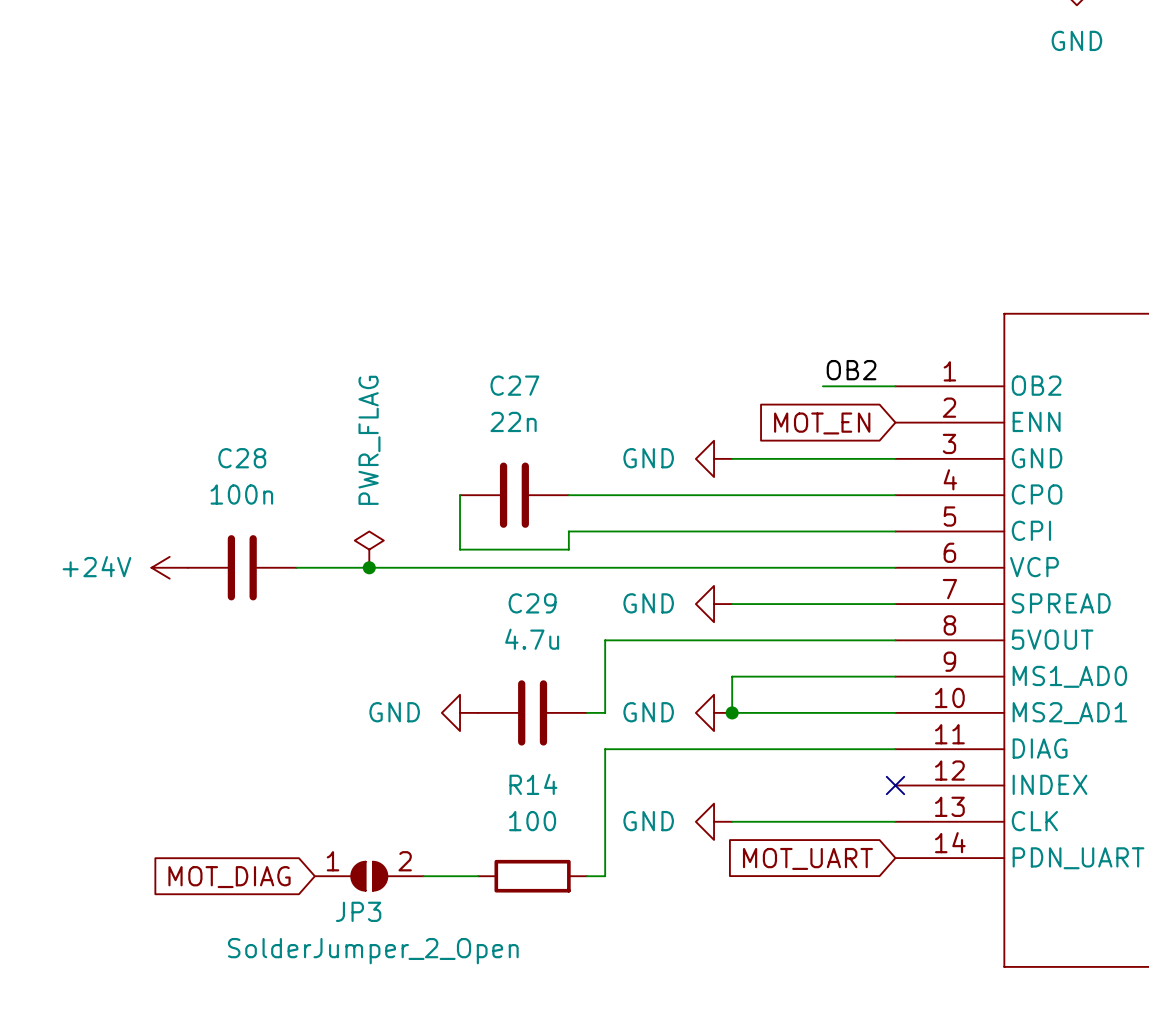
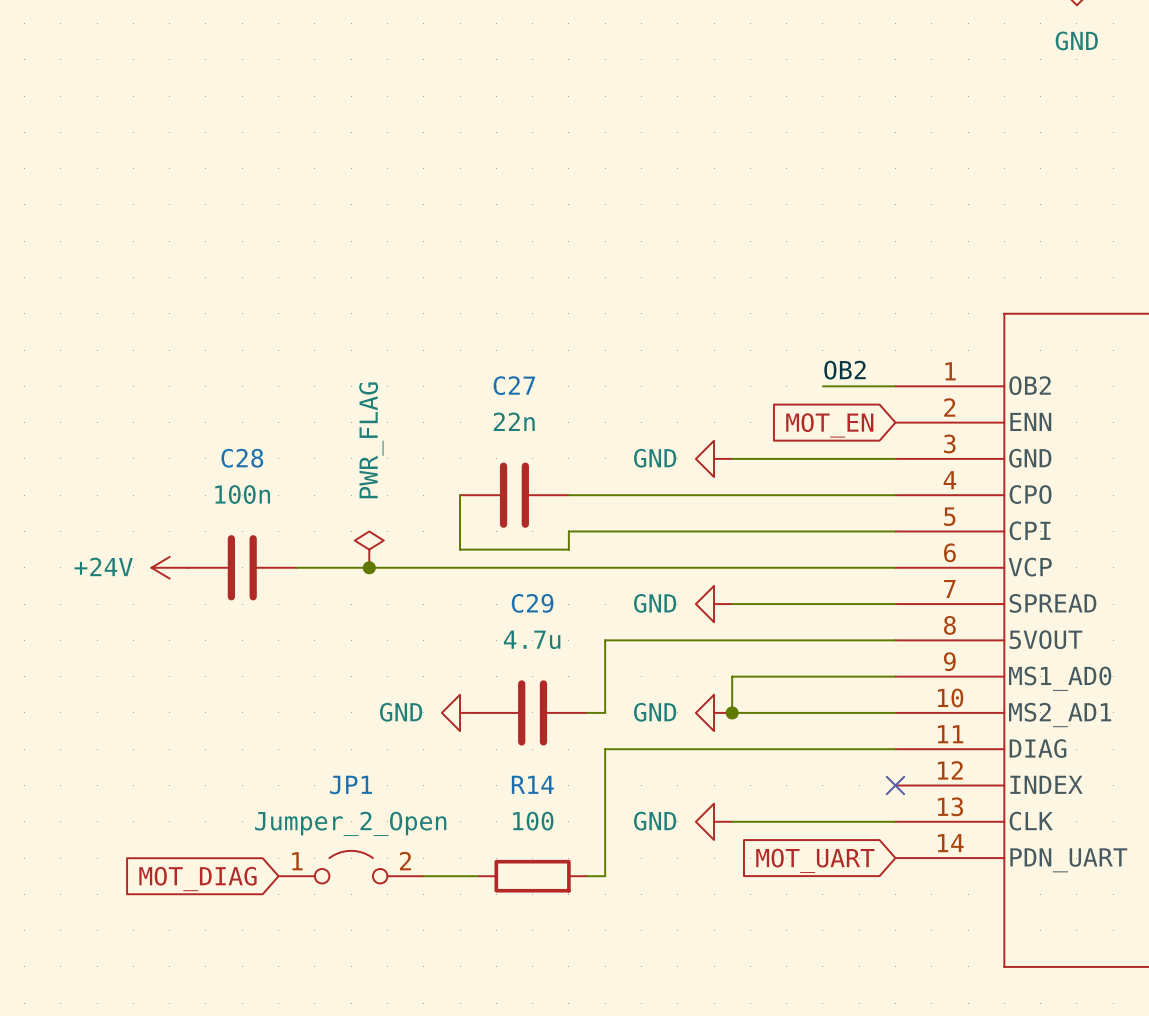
JP1: none -> Jumper_2_Open (351, 867)
JP3: SolderJumper_2_Open (369, 876) -> none
global label position: MOT_DIAG (229, 877) -> MOT_DIAG (197, 878)

